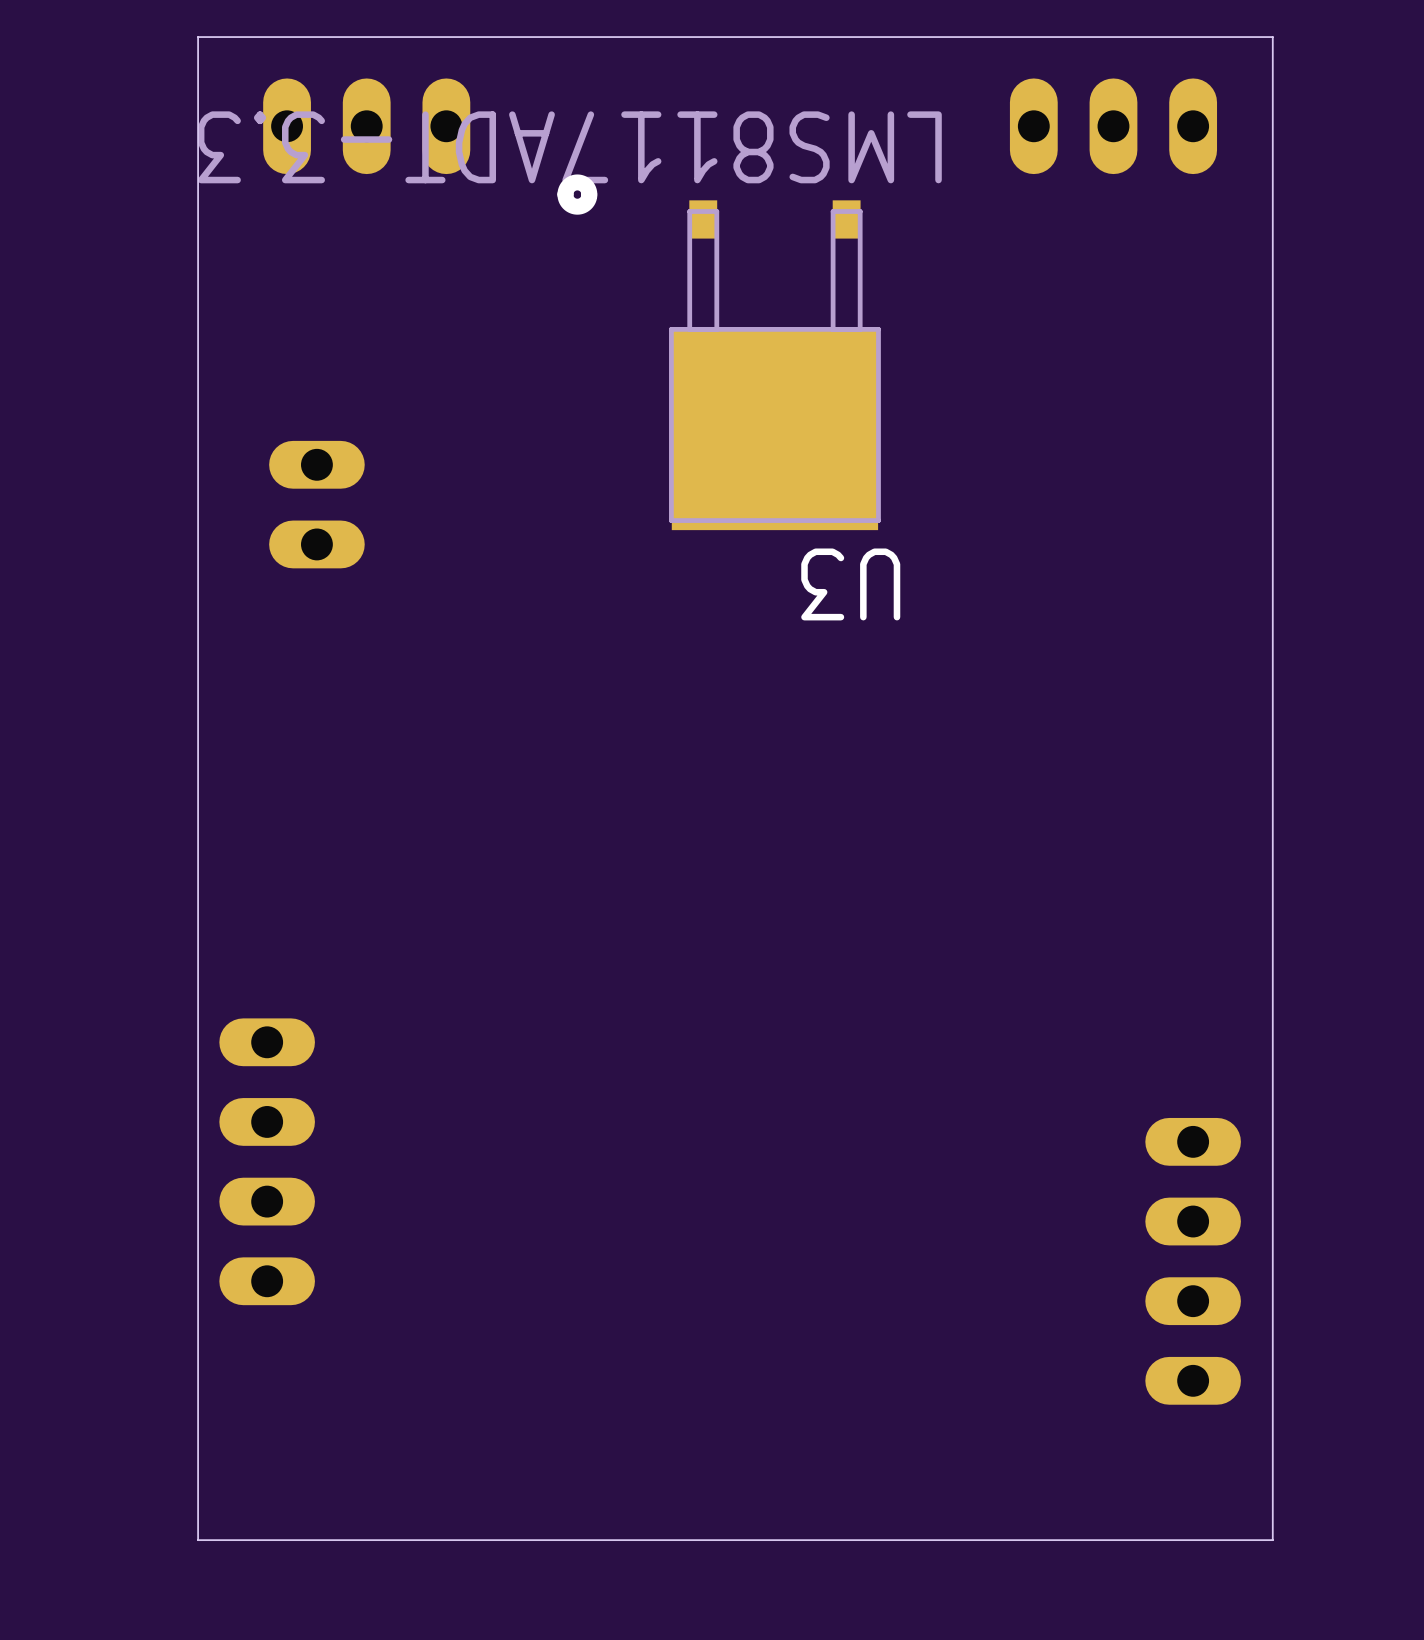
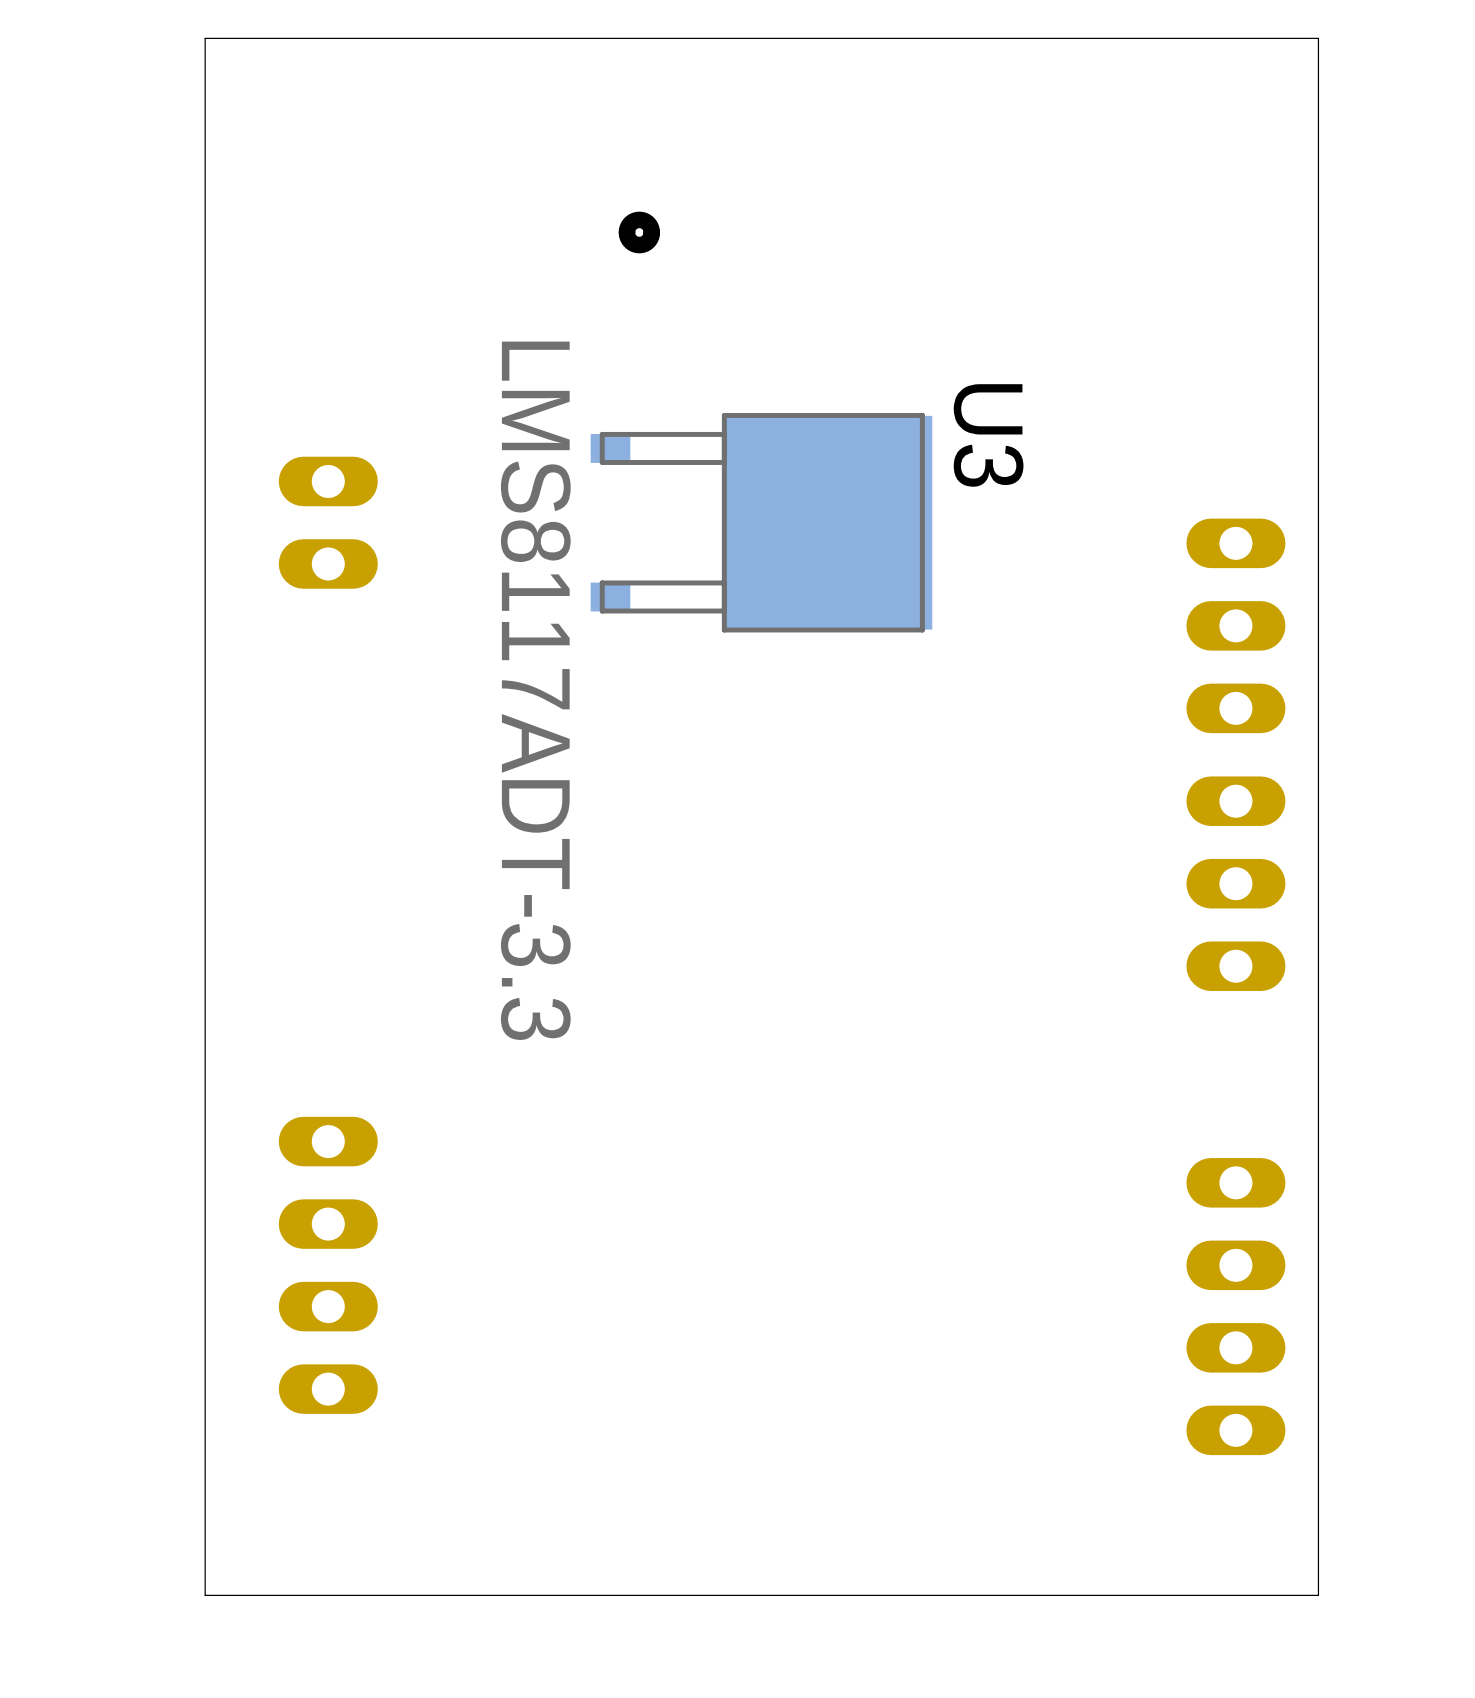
part: (366, 126) -> none
part: (1113, 126) -> none
part position: (577, 194) -> (639, 232)
U3 rotation: 0° (774, 365) -> 90° counterclockwise (761, 522)
part: none -> (1235, 625)
part: none -> (1235, 883)
part position: (267, 1161) -> (328, 1265)

